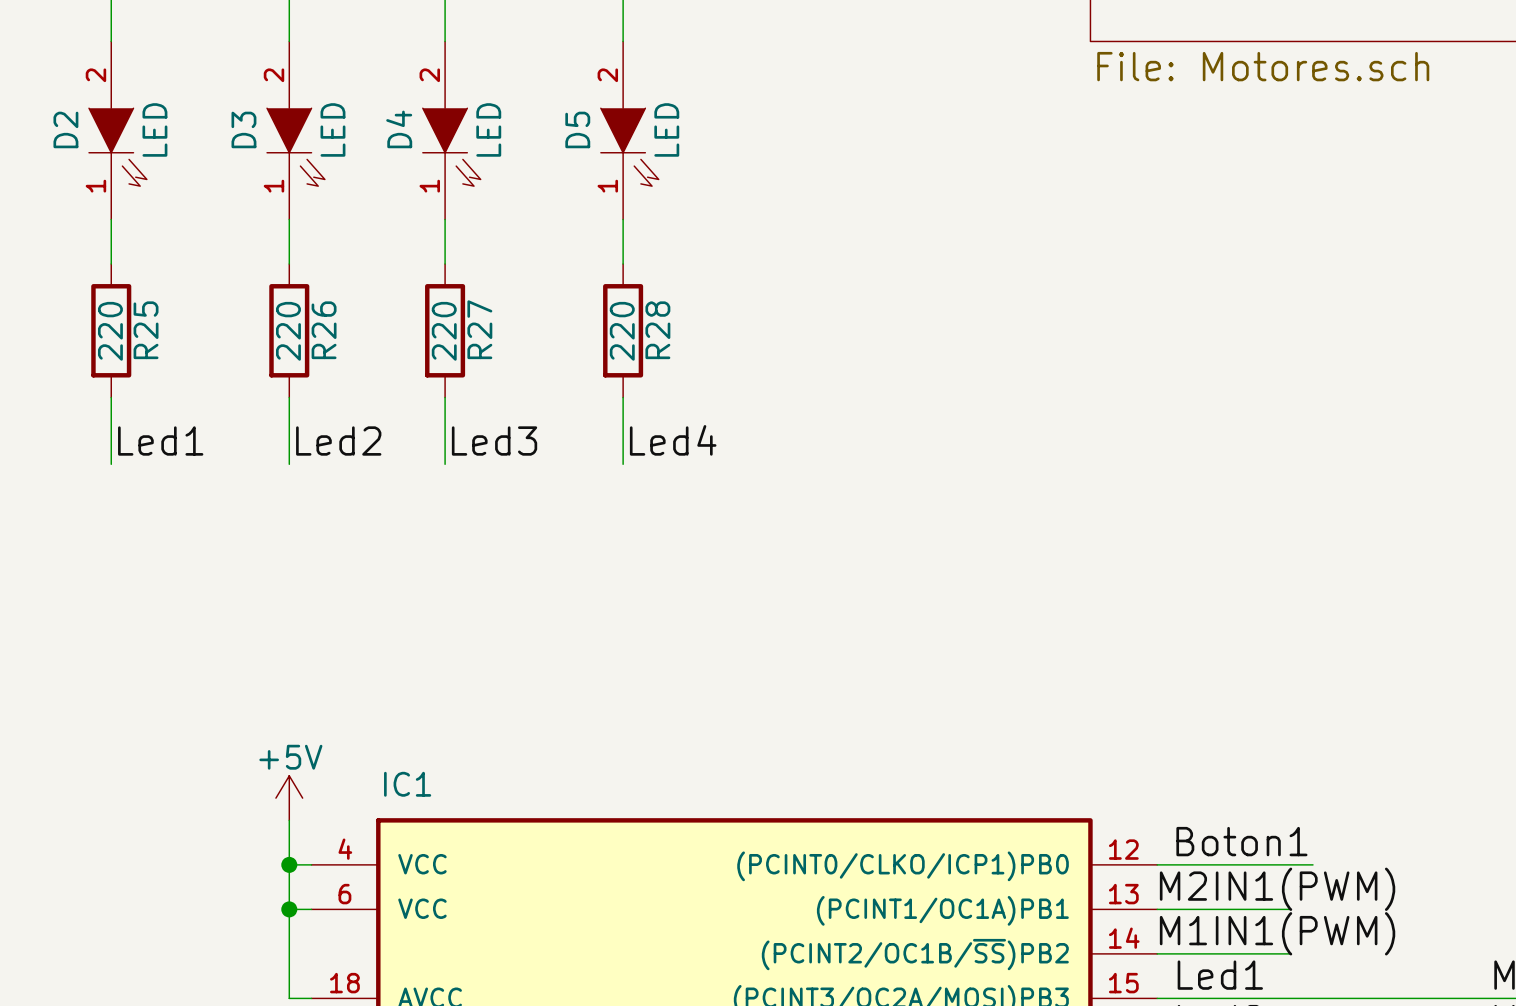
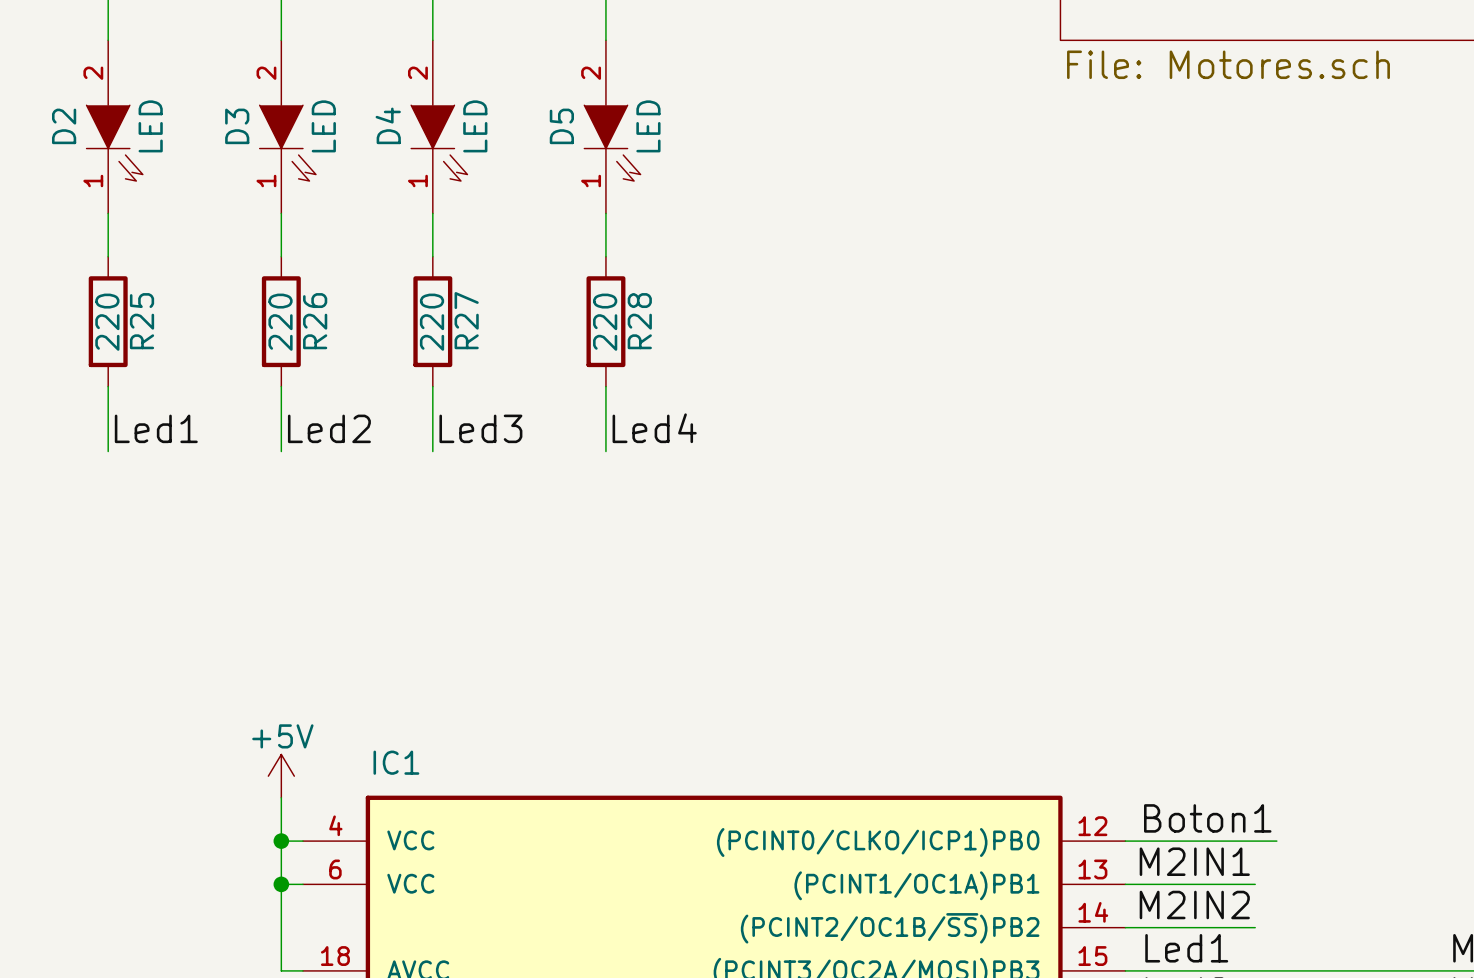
label: M2IN1(PWM) (1277, 889) -> M2IN1 (1194, 861)
label: none -> M2IN2 (1194, 904)
label: M1IN1(PWM) (1277, 933) -> none

